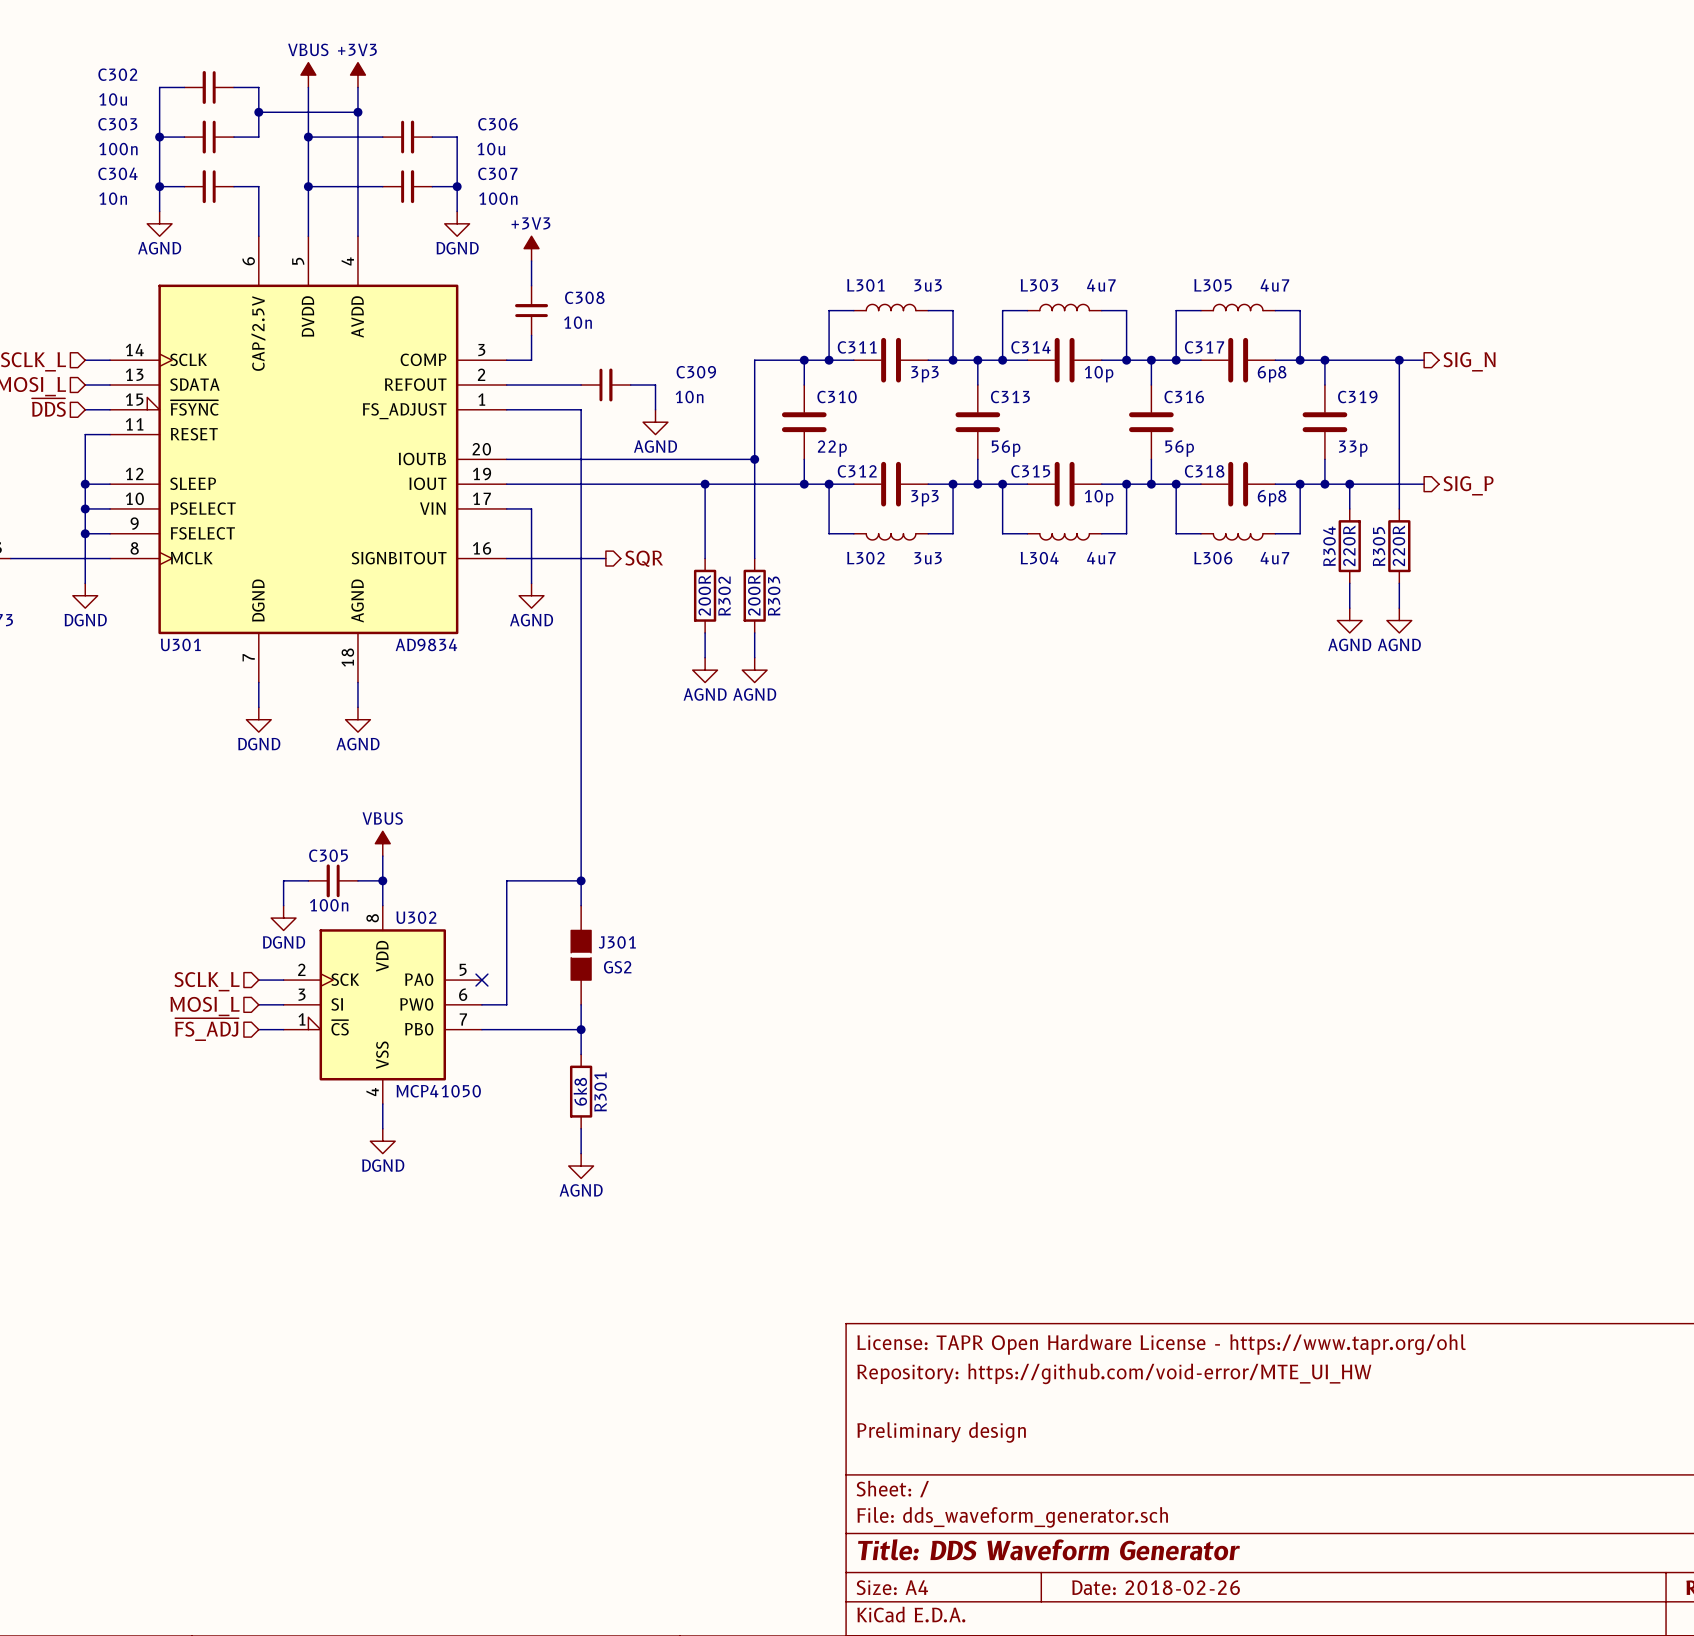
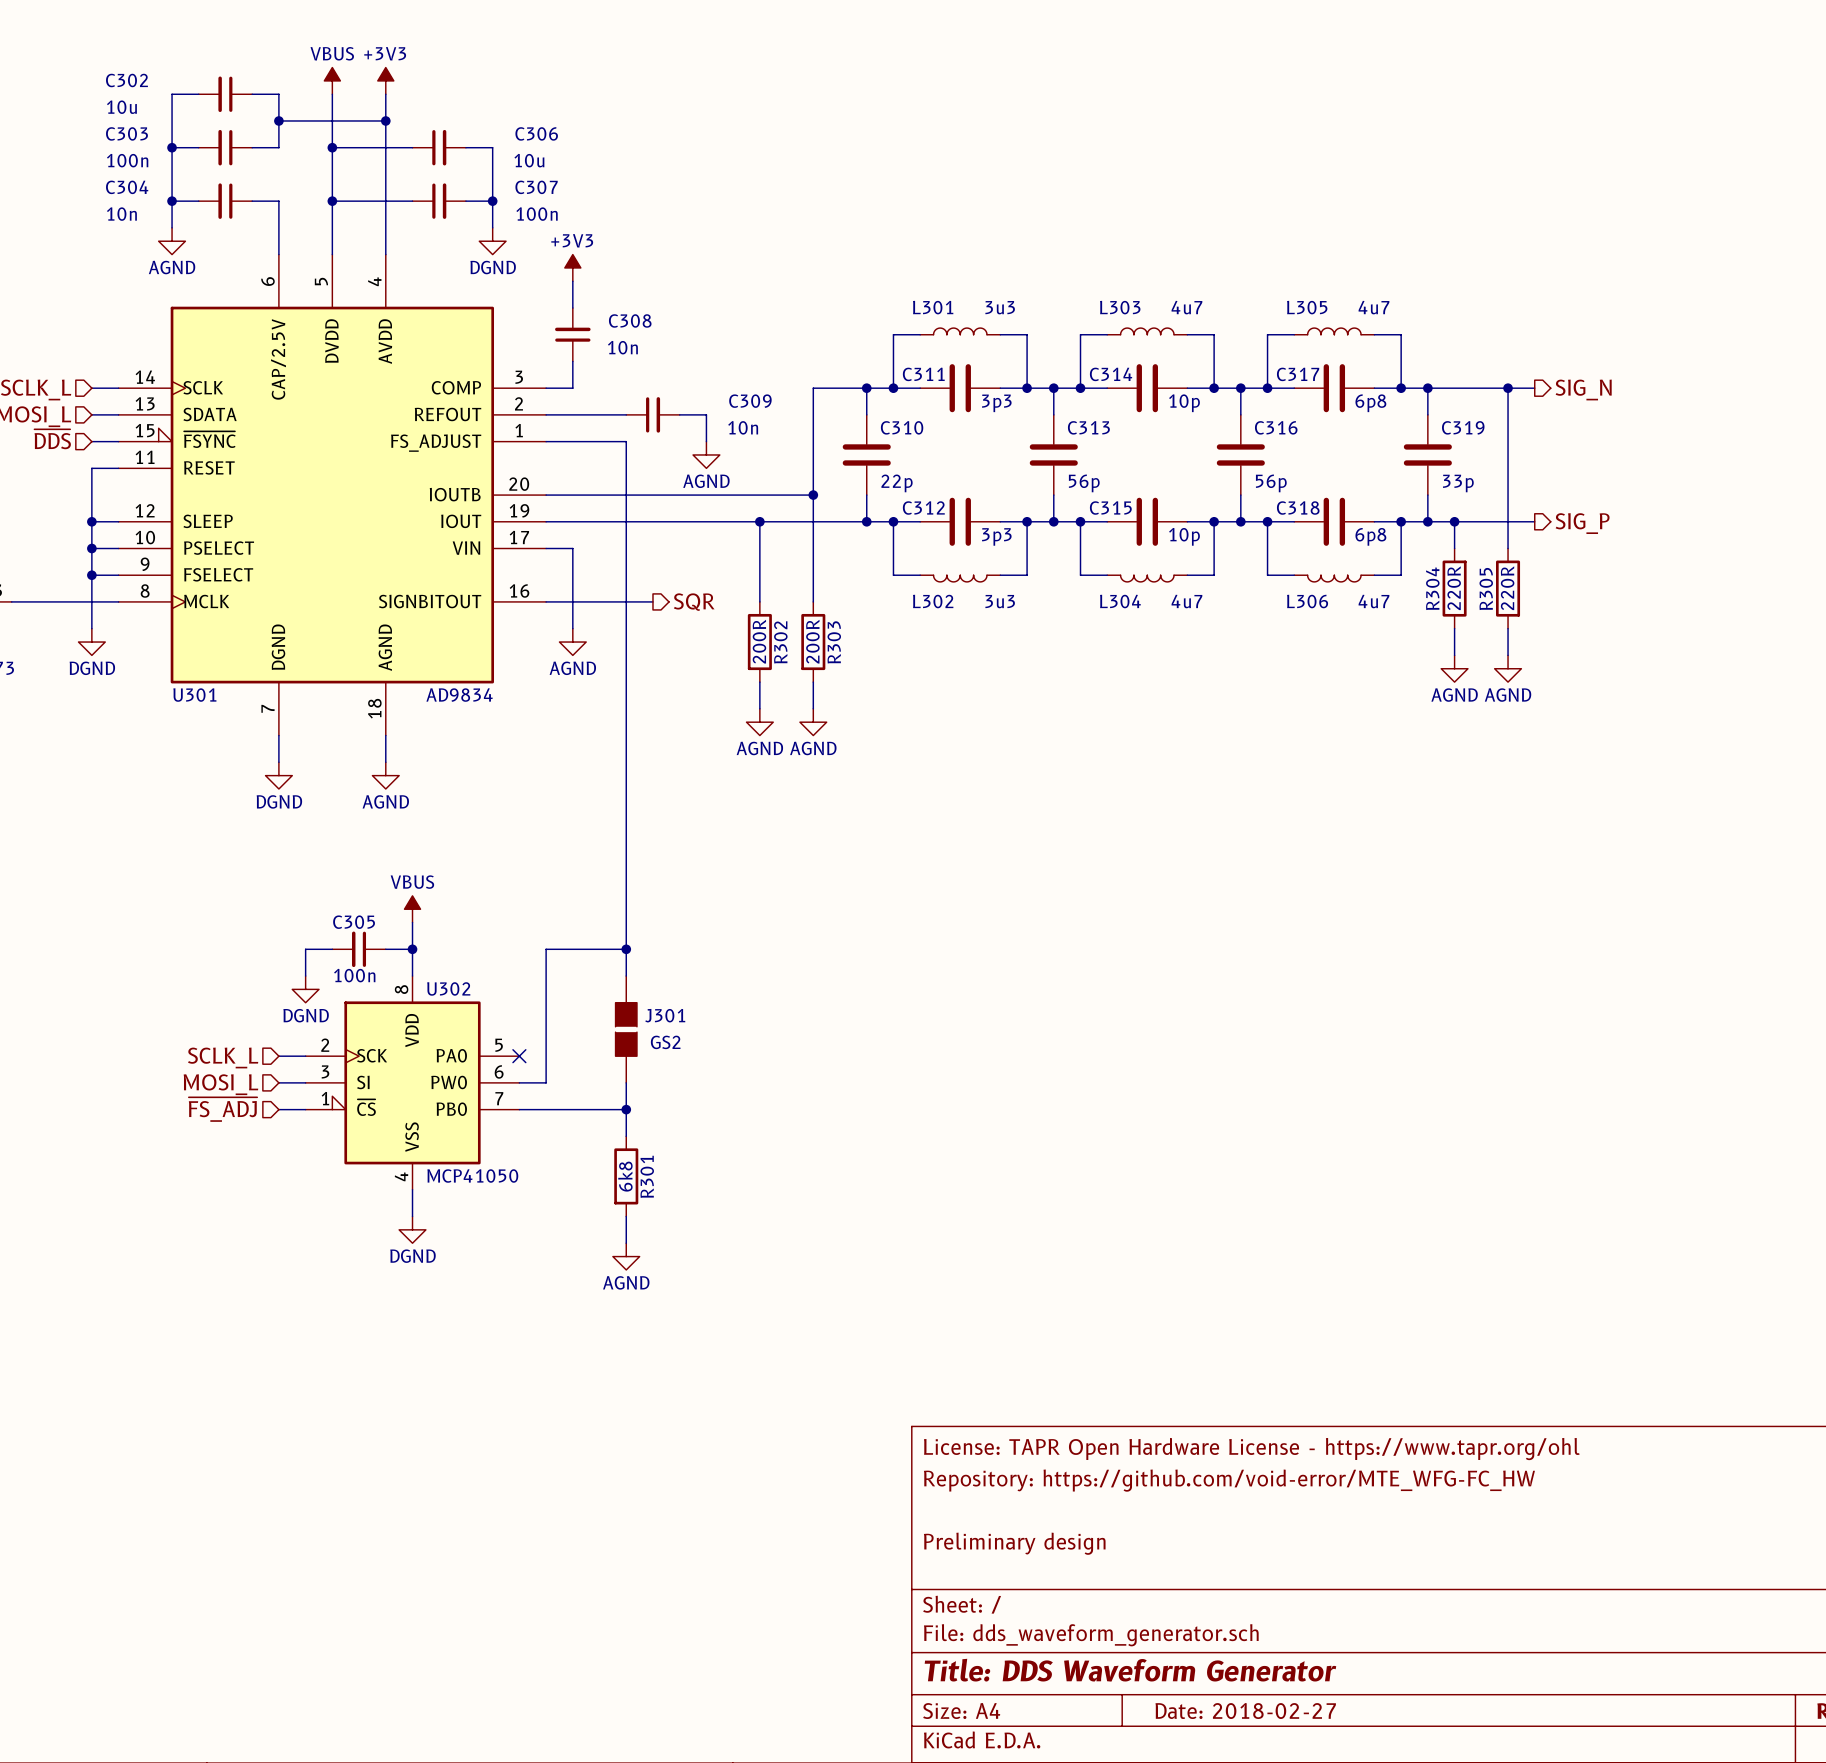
title block: Repository: https://github.com/void-error/MTE_UI_HW (1114, 1373) -> Repository: https://github.com/void-error/MTE_WFG-FC_HW (1229, 1480)
title block: Date: 2018-02-26 (1156, 1587) -> Date: 2018-02-27 (1245, 1711)

